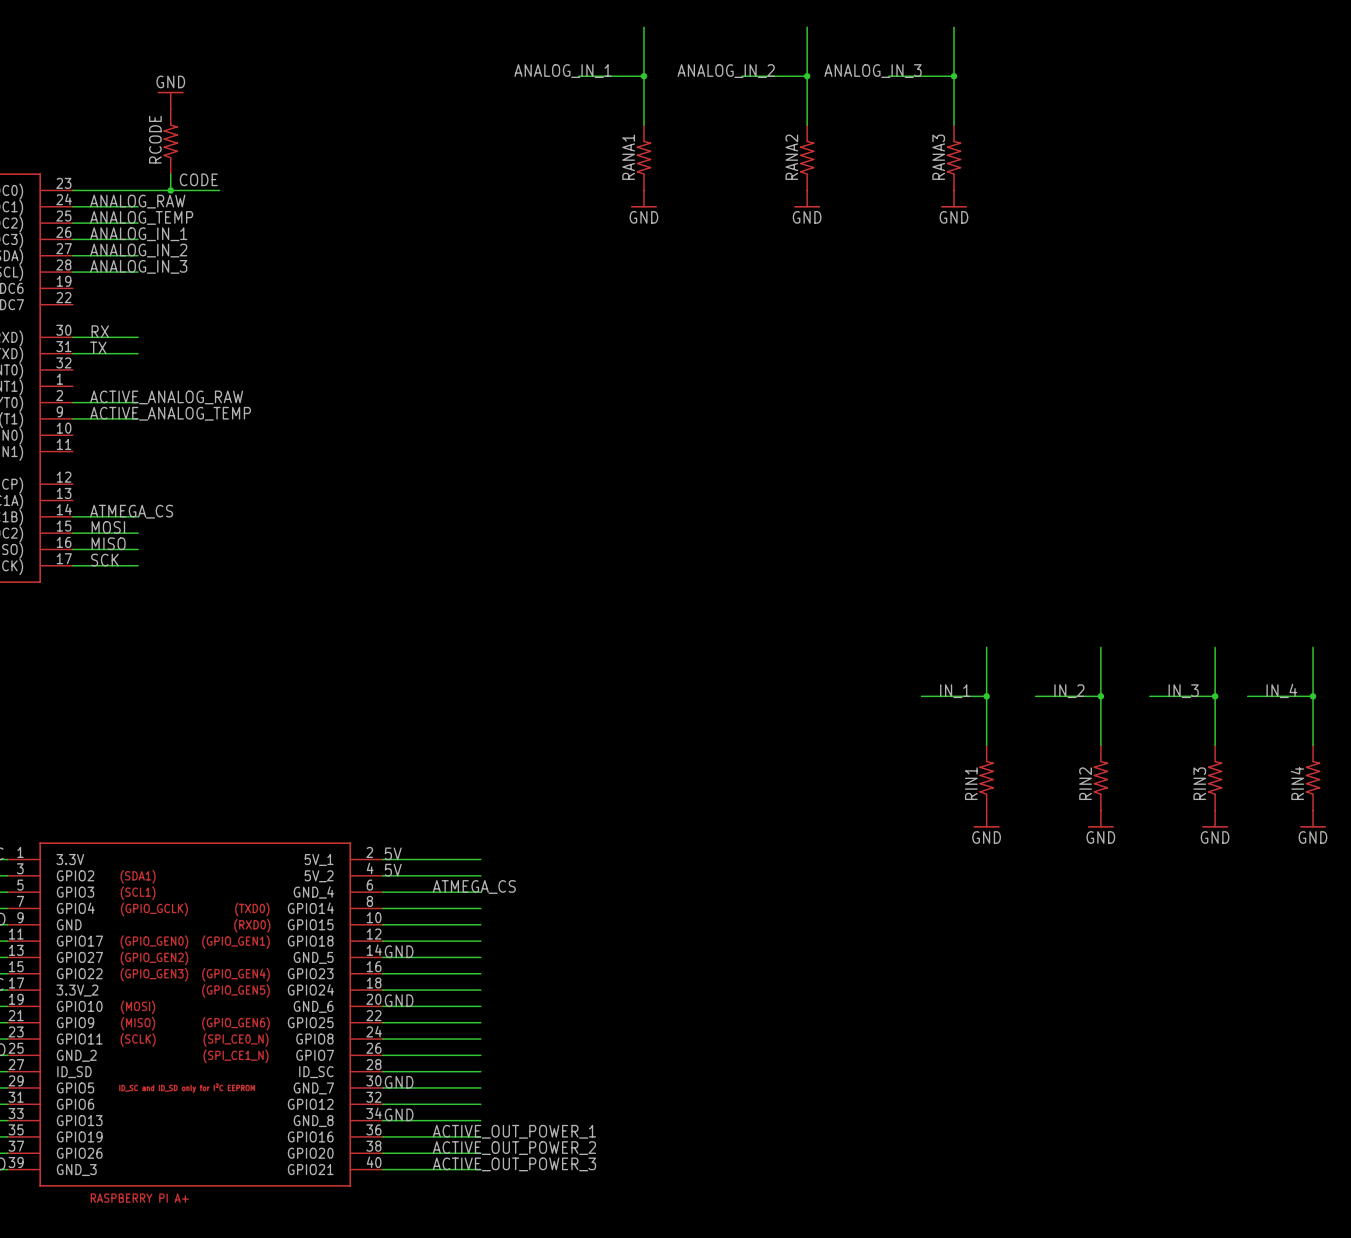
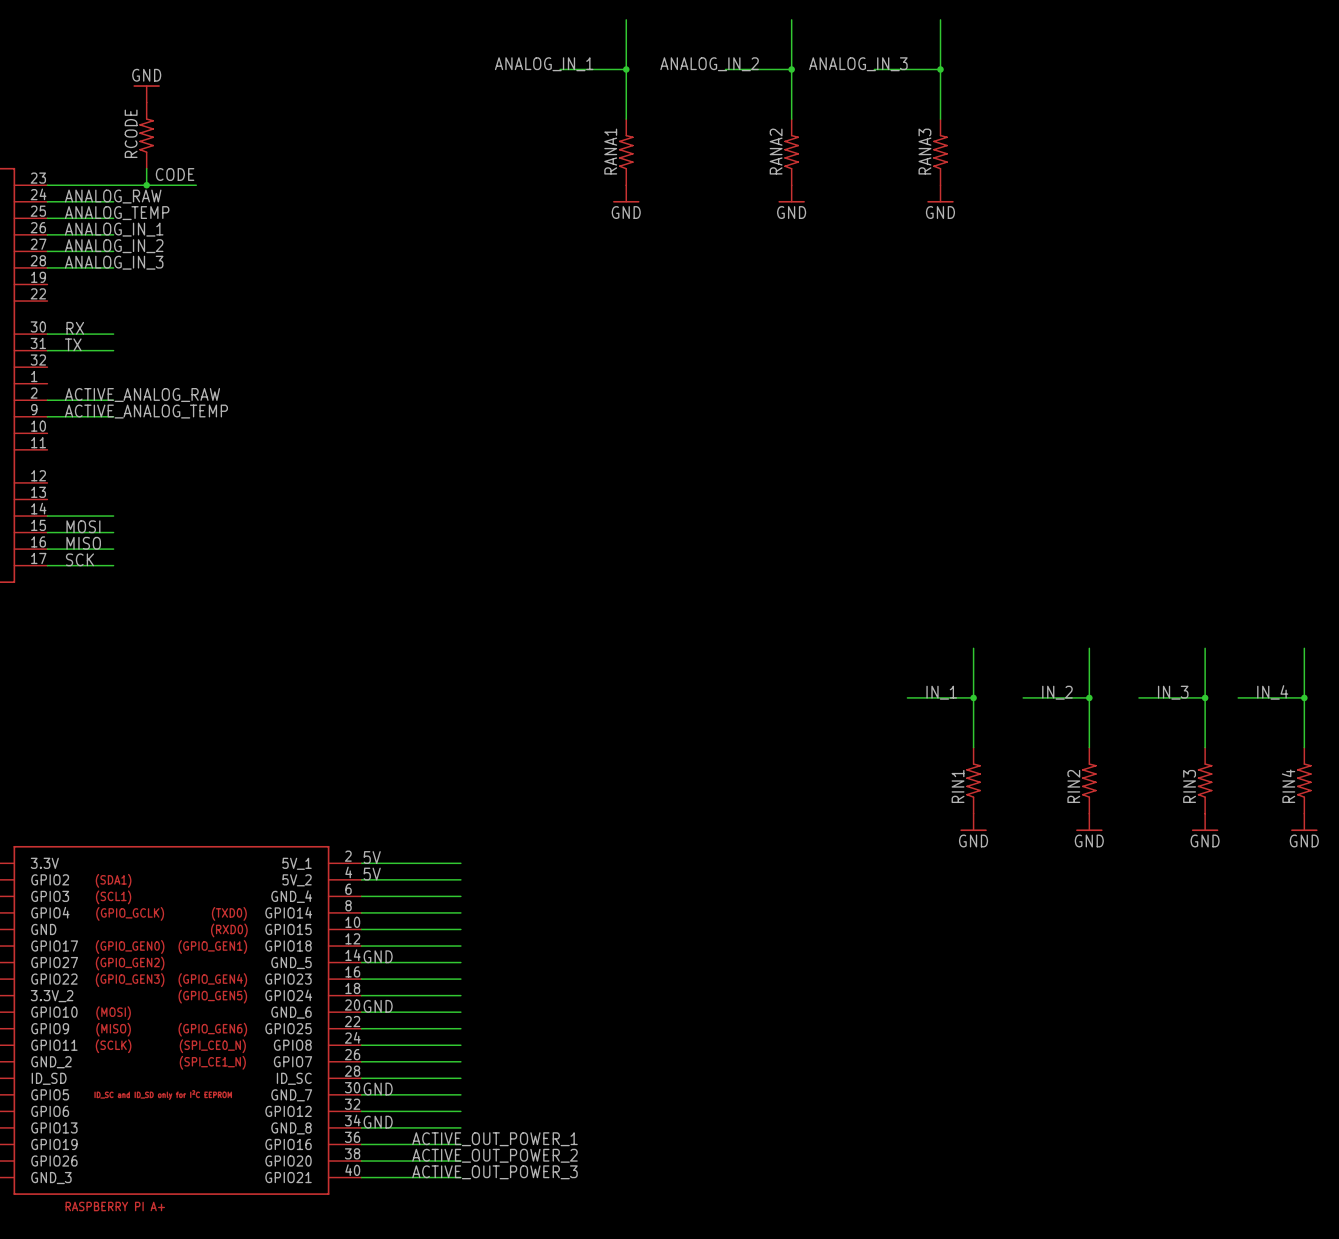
label: ATMEGA_CS (131, 511) -> none
label: ATMEGA_CS (474, 886) -> none

